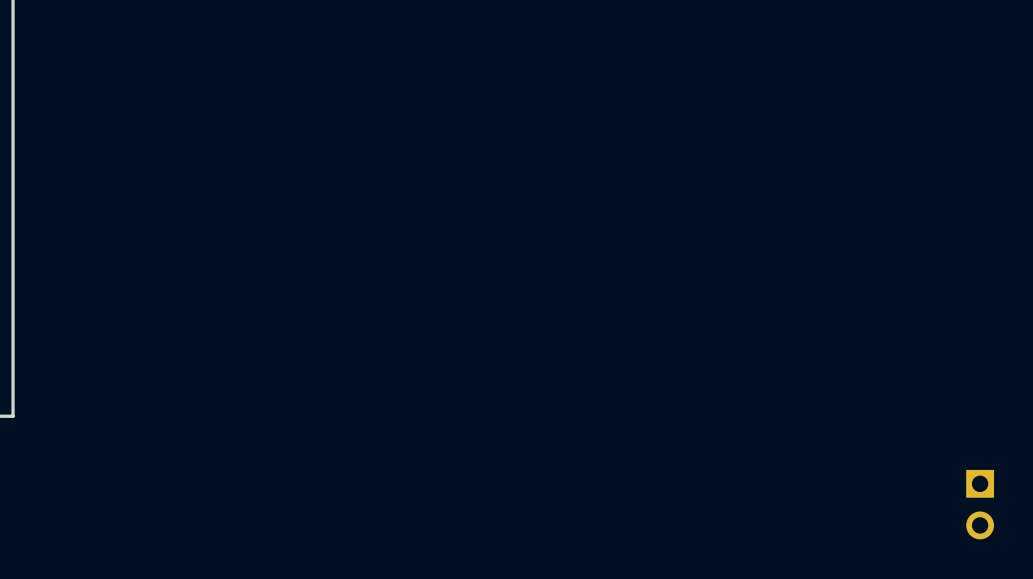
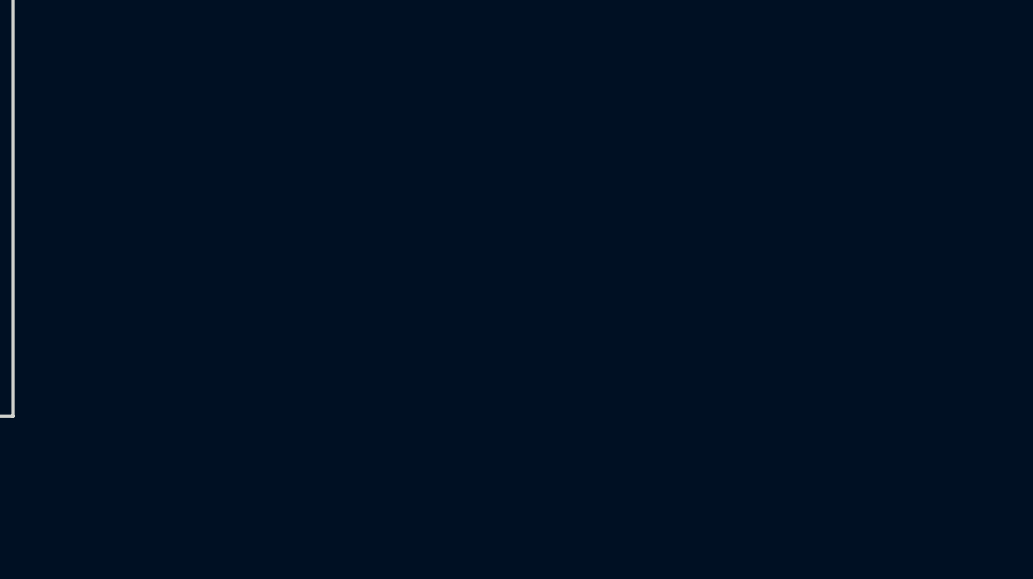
part: (980, 504) -> none

